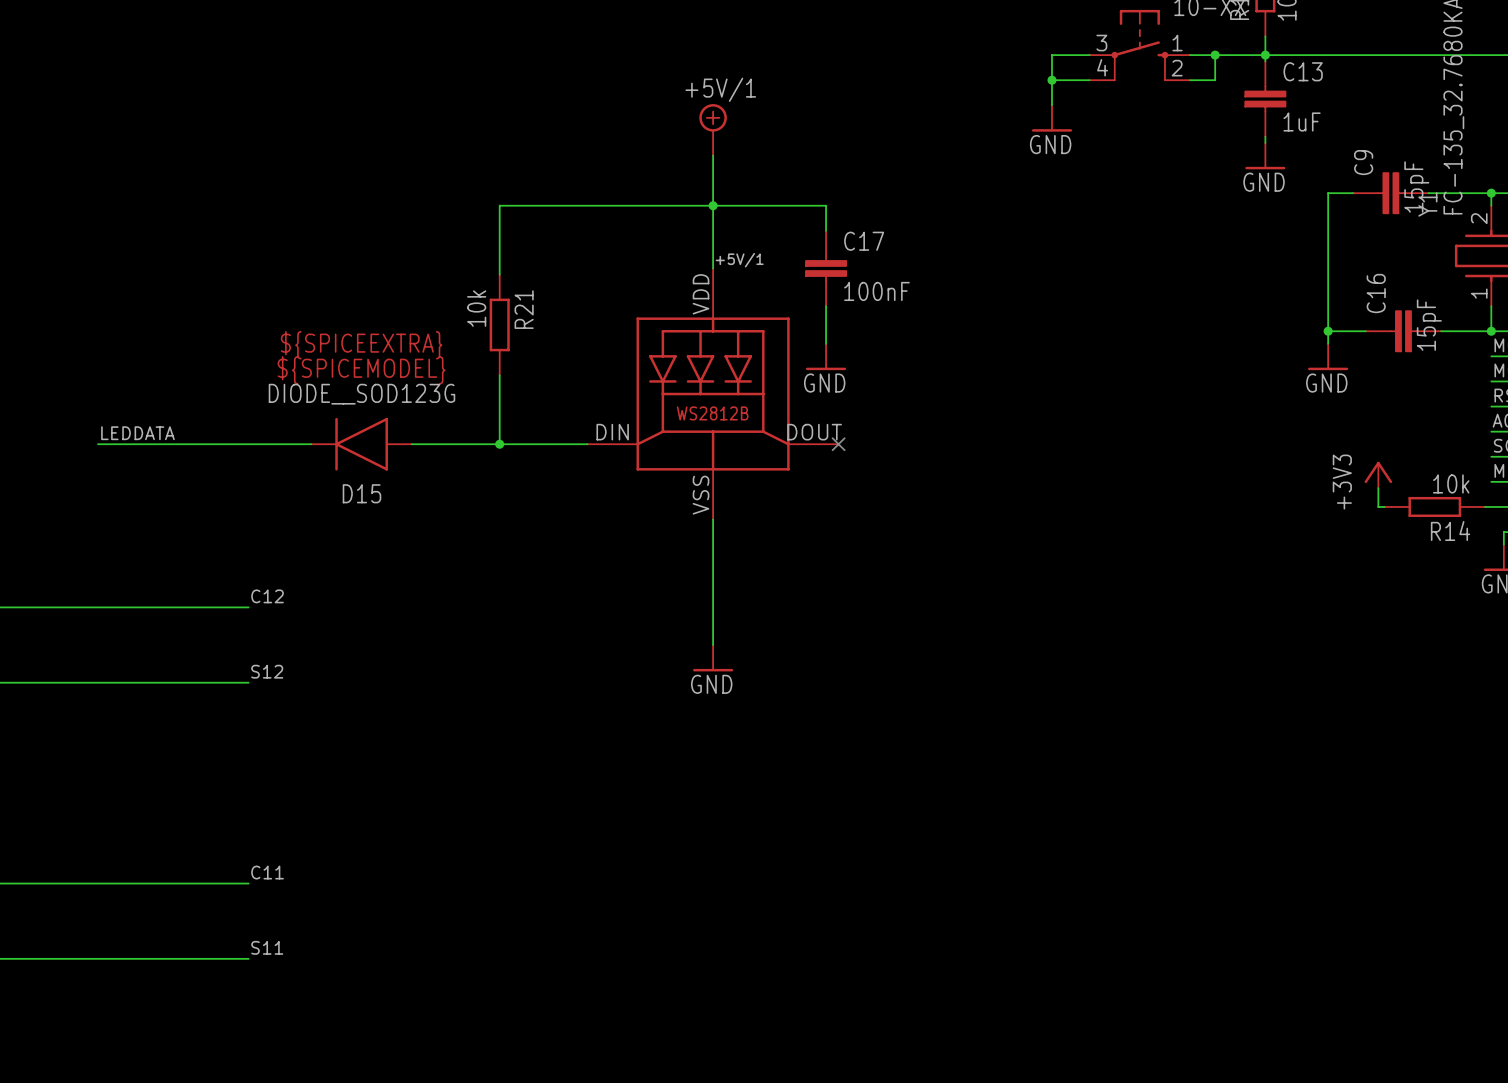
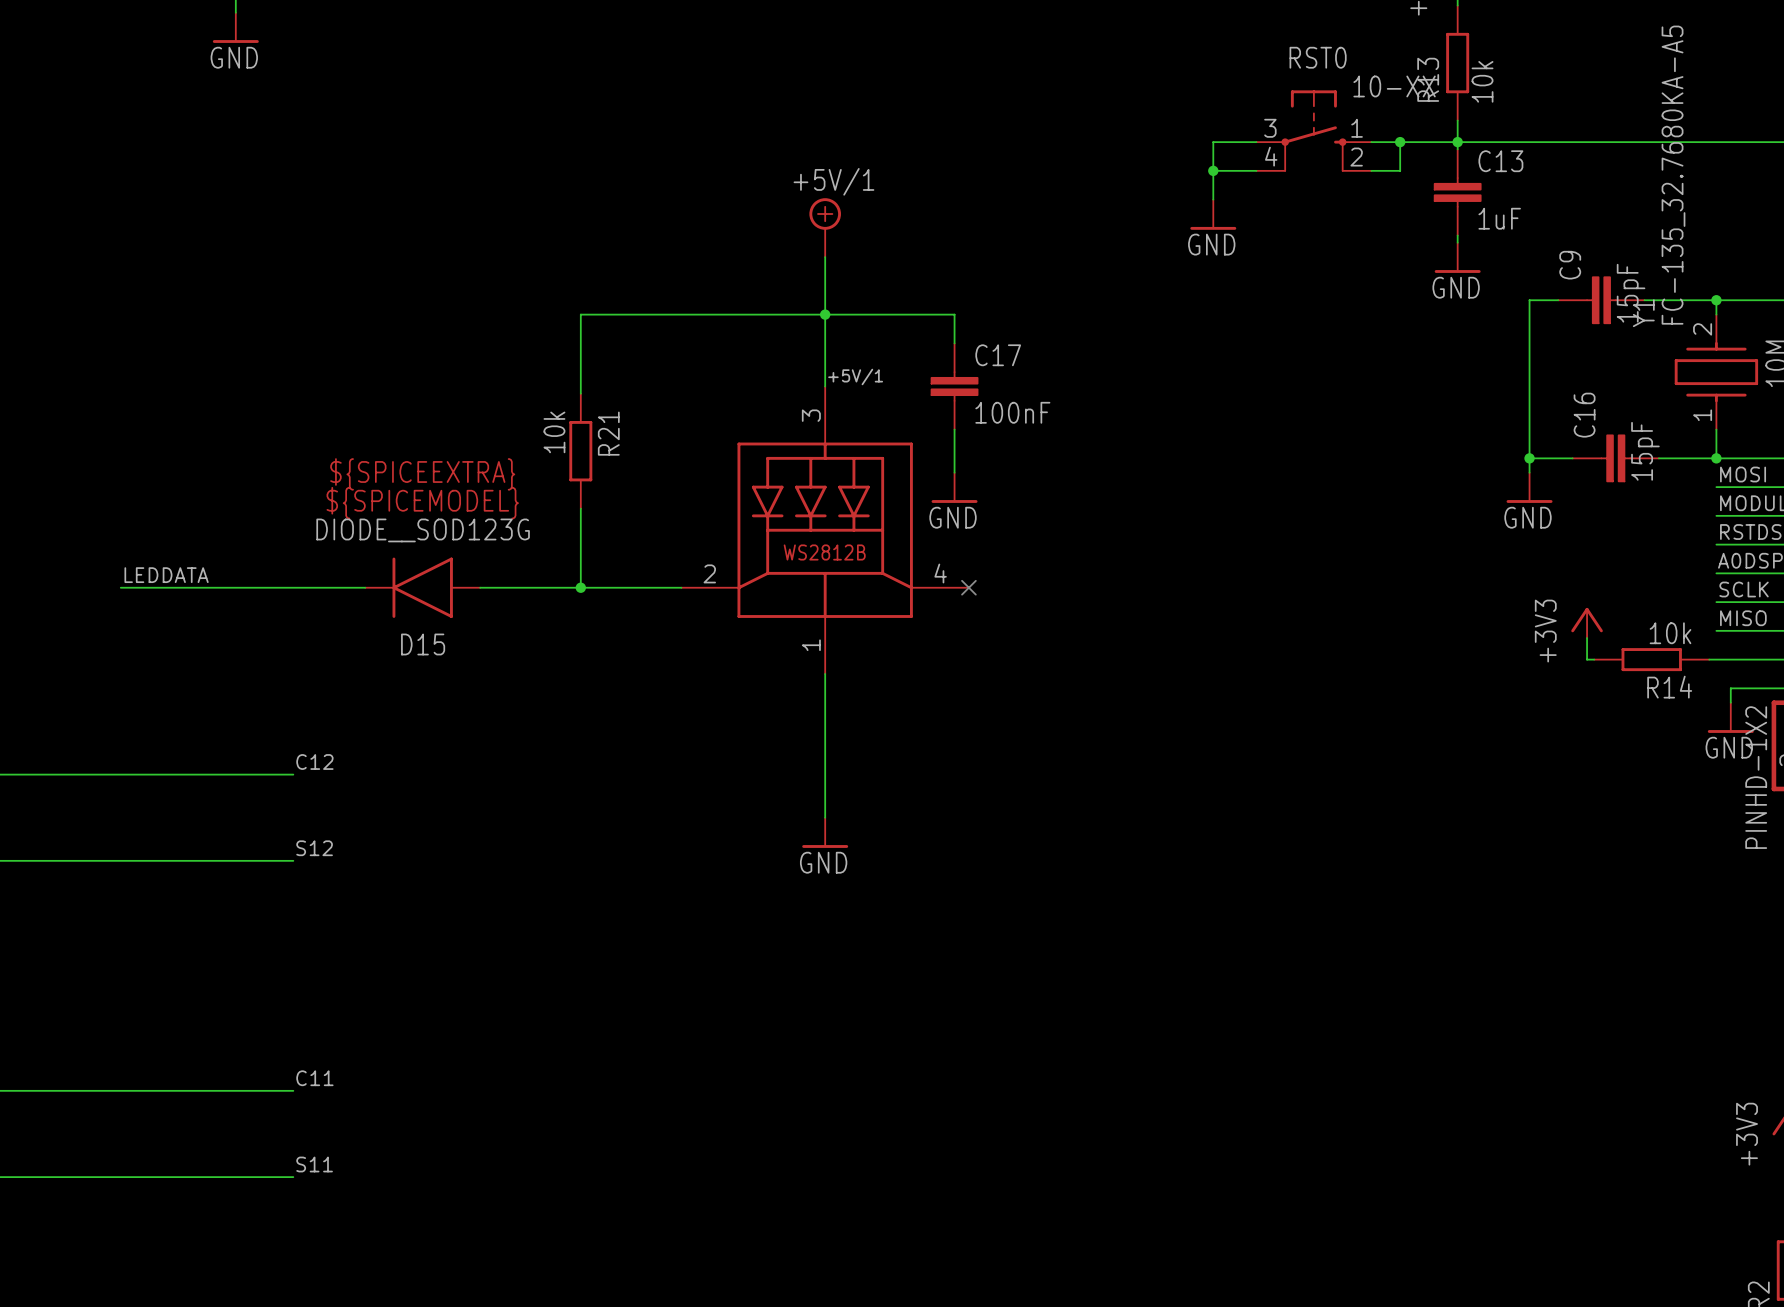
part pin number: VDD (701, 294) -> 3 (811, 415)
part pin number: DIN (612, 432) -> 2 (709, 573)
part pin number: DOUT (814, 432) -> 4 (940, 573)
part pin number: VSS (701, 495) -> 1 (811, 645)

